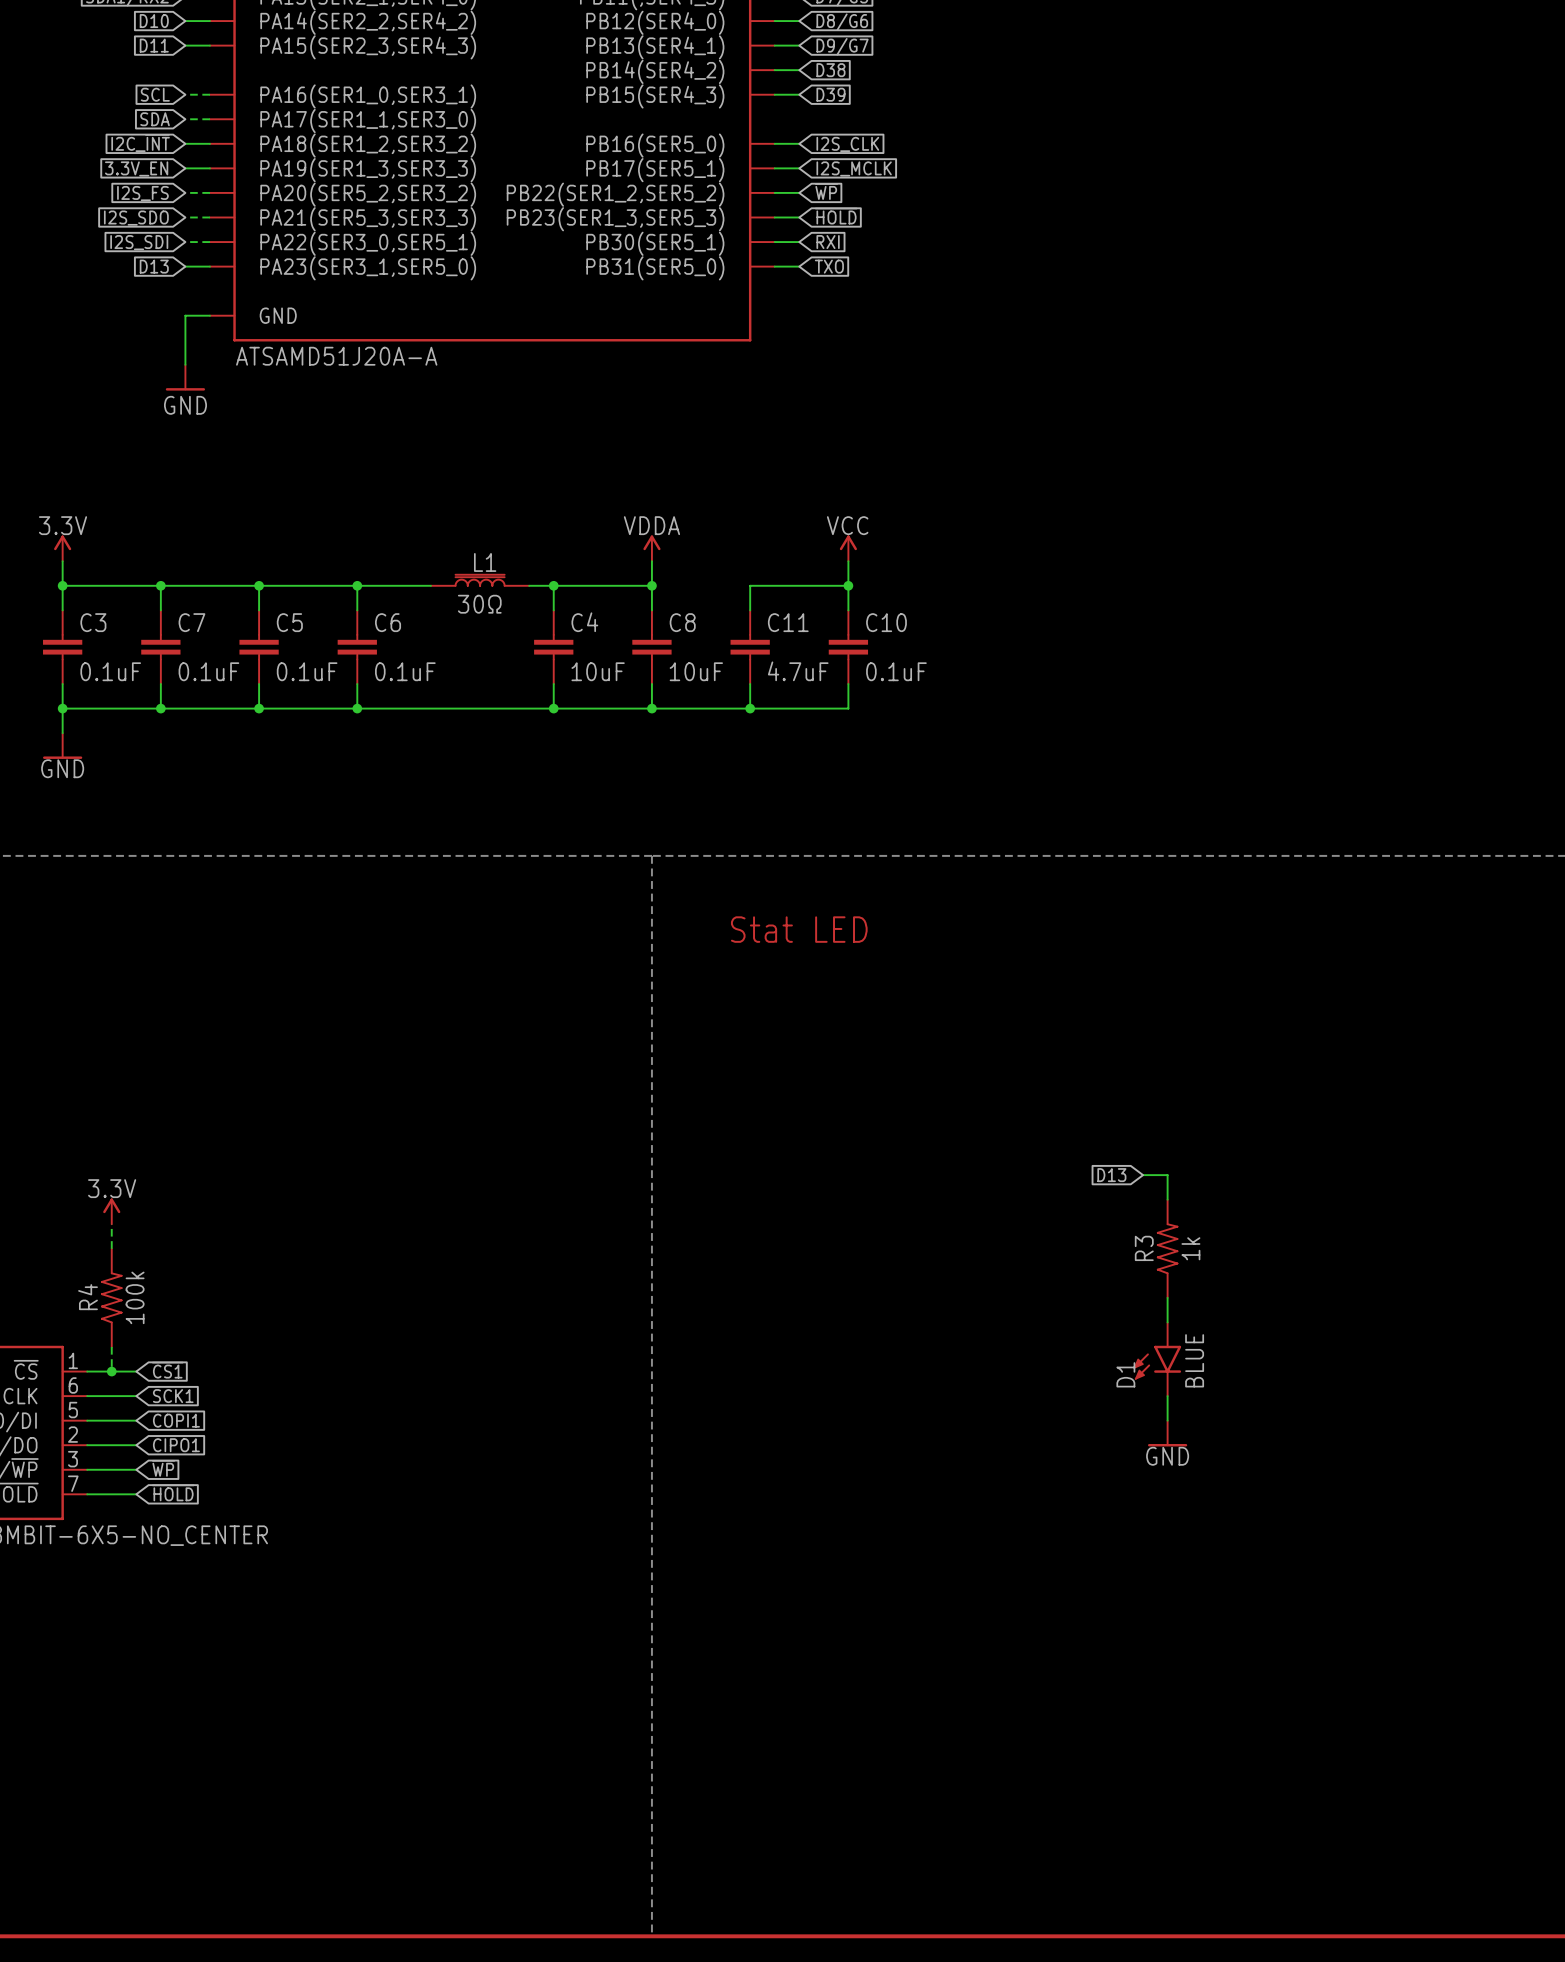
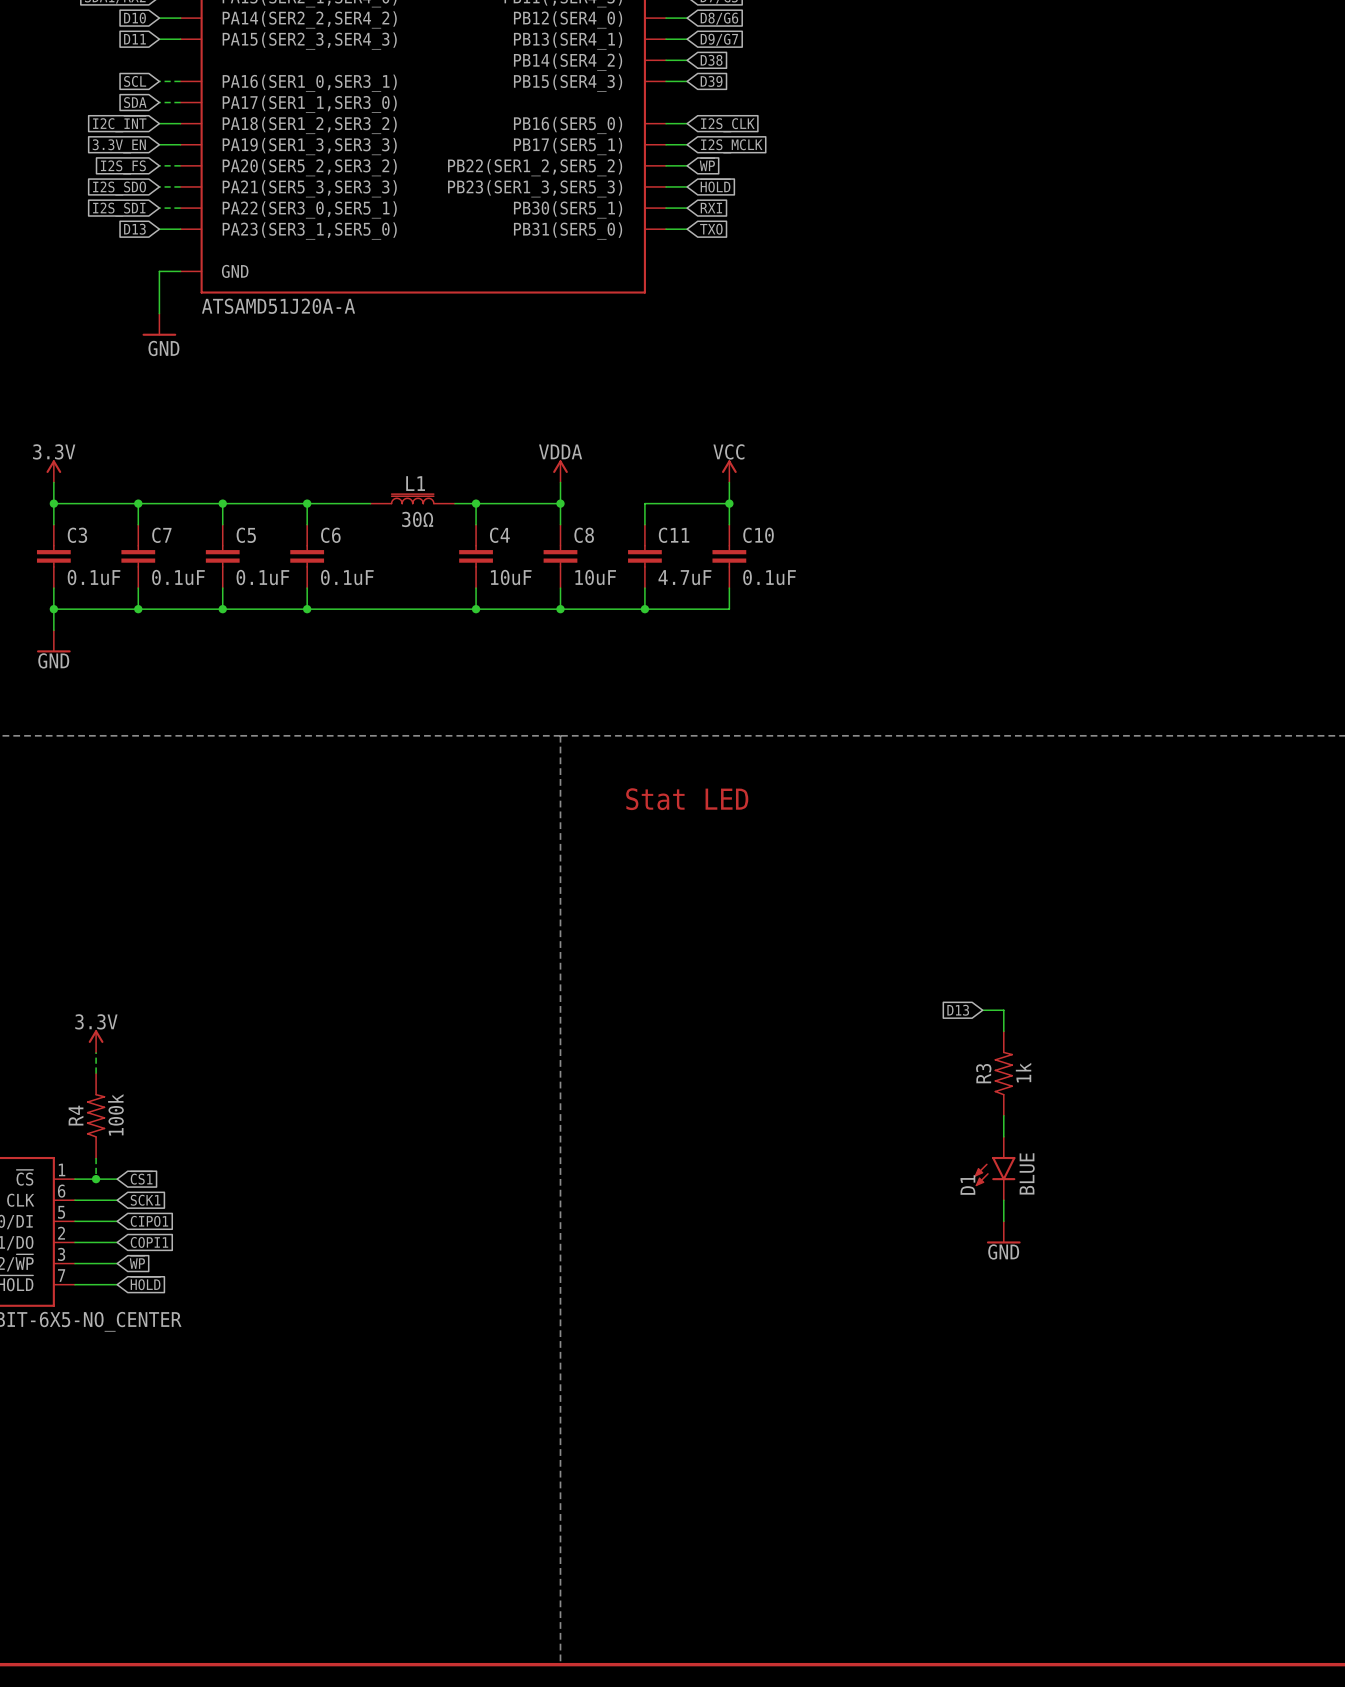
global label: COPI1 (176, 1420) -> CIPO1 (149, 1221)
global label: CIPO1 (176, 1445) -> COPI1 (149, 1242)

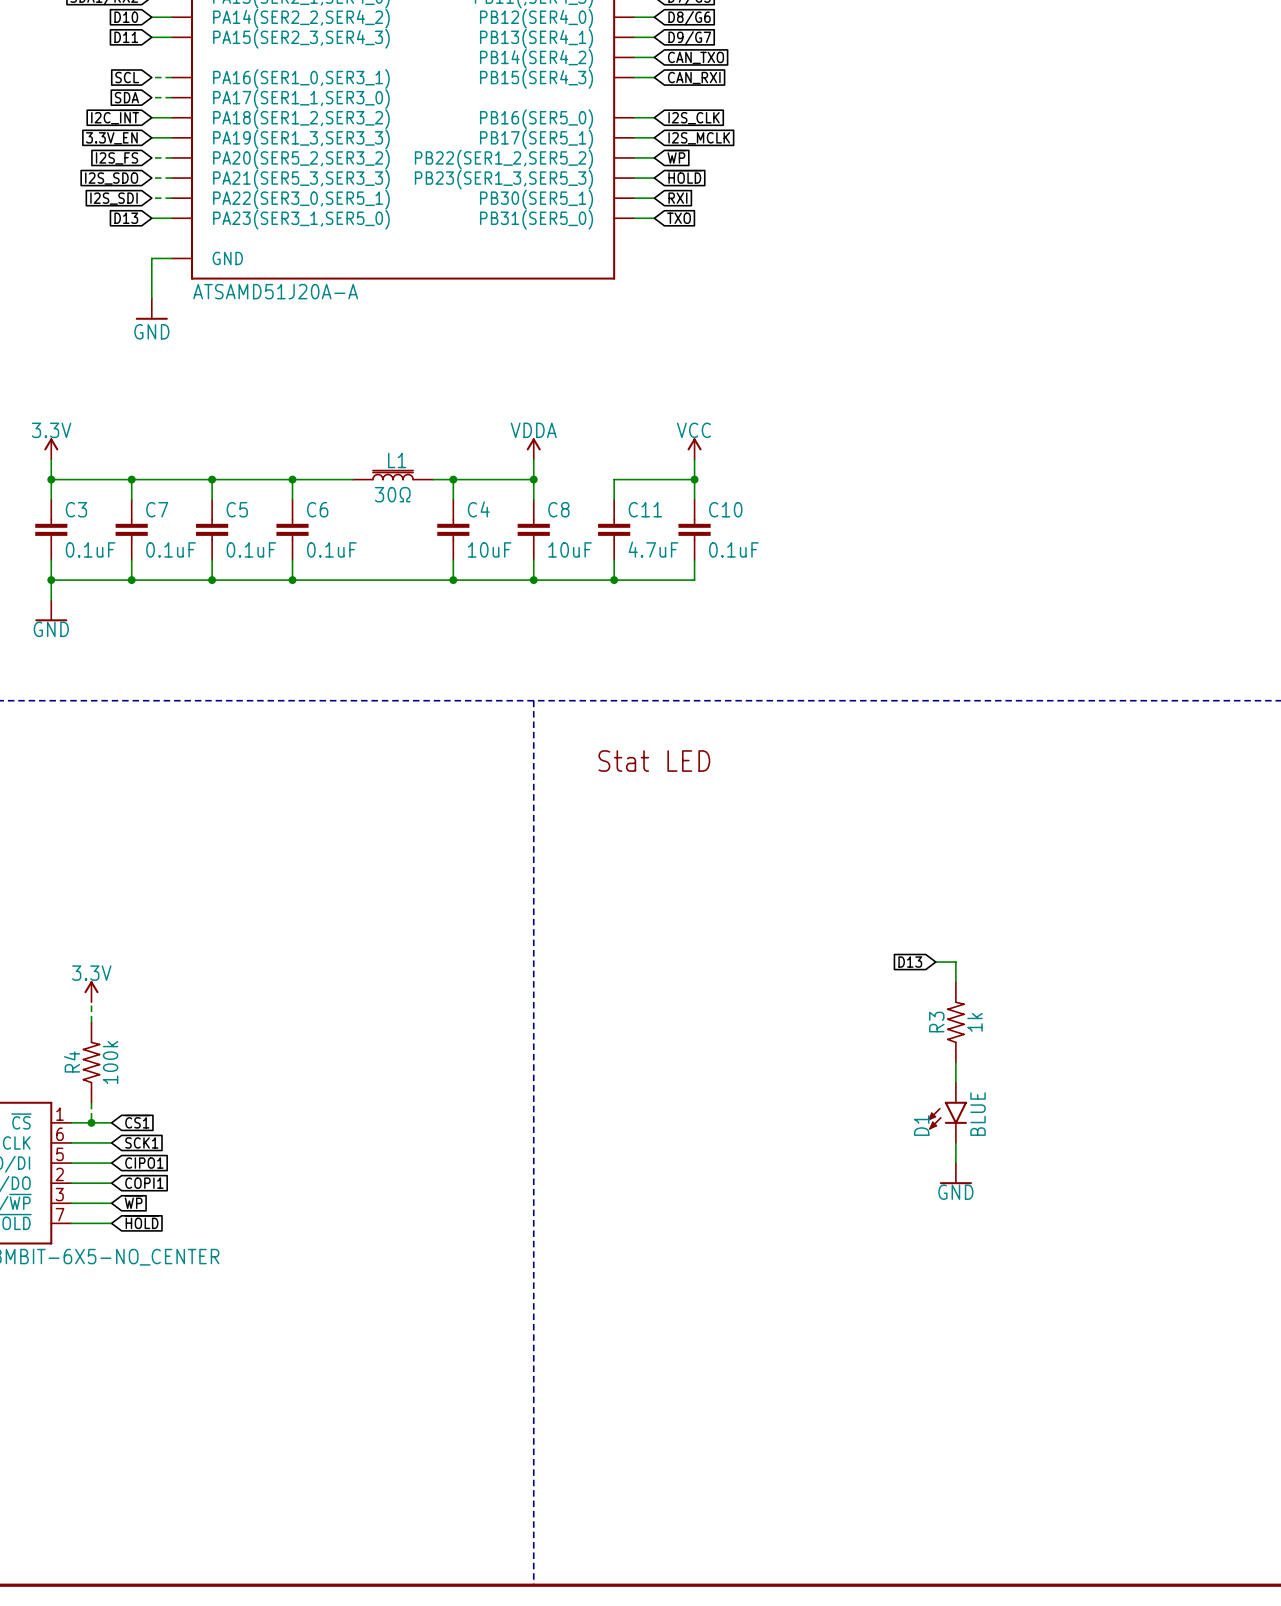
global label: D38 (711, 60) -> CAN_TXO (696, 57)
global label: D39 (711, 81) -> CAN_RXI (694, 78)

